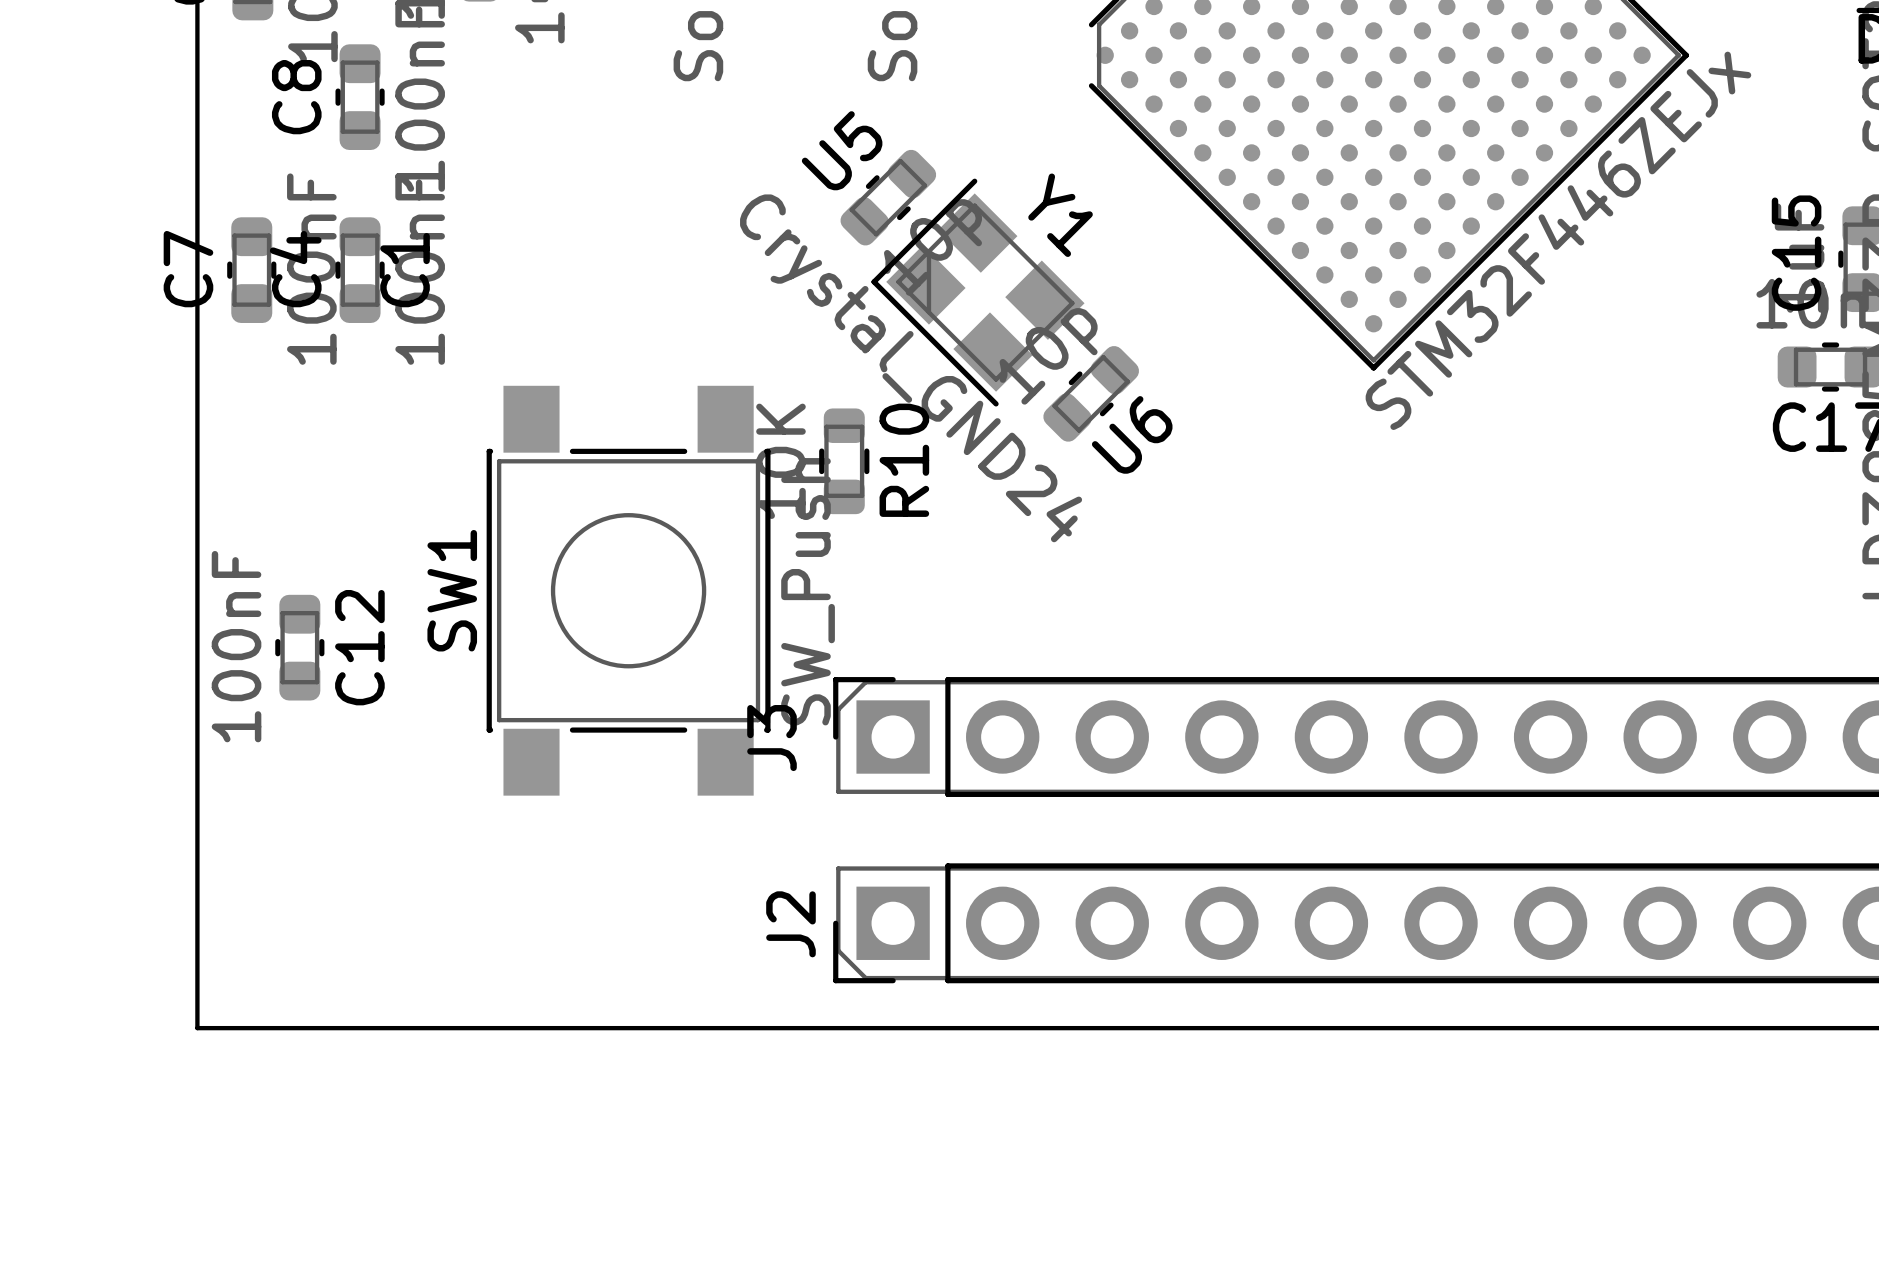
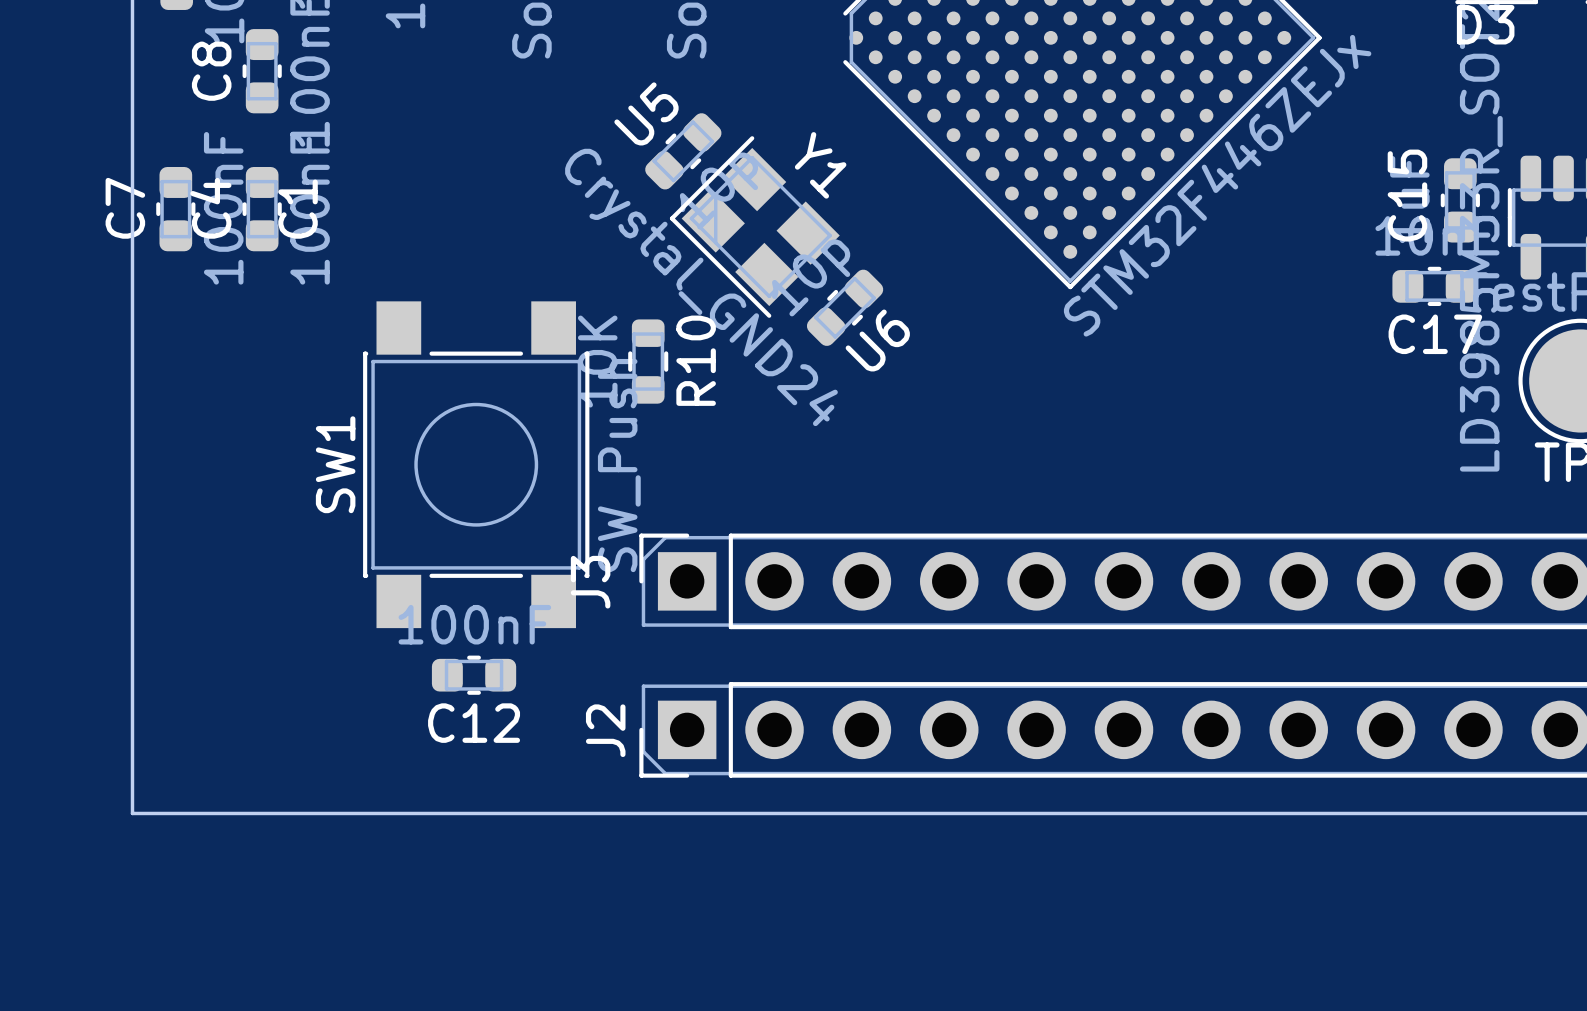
C12 rotation: 0° (299, 647) -> 90° clockwise (474, 675)
C12 position: (299, 647) -> (474, 675)

